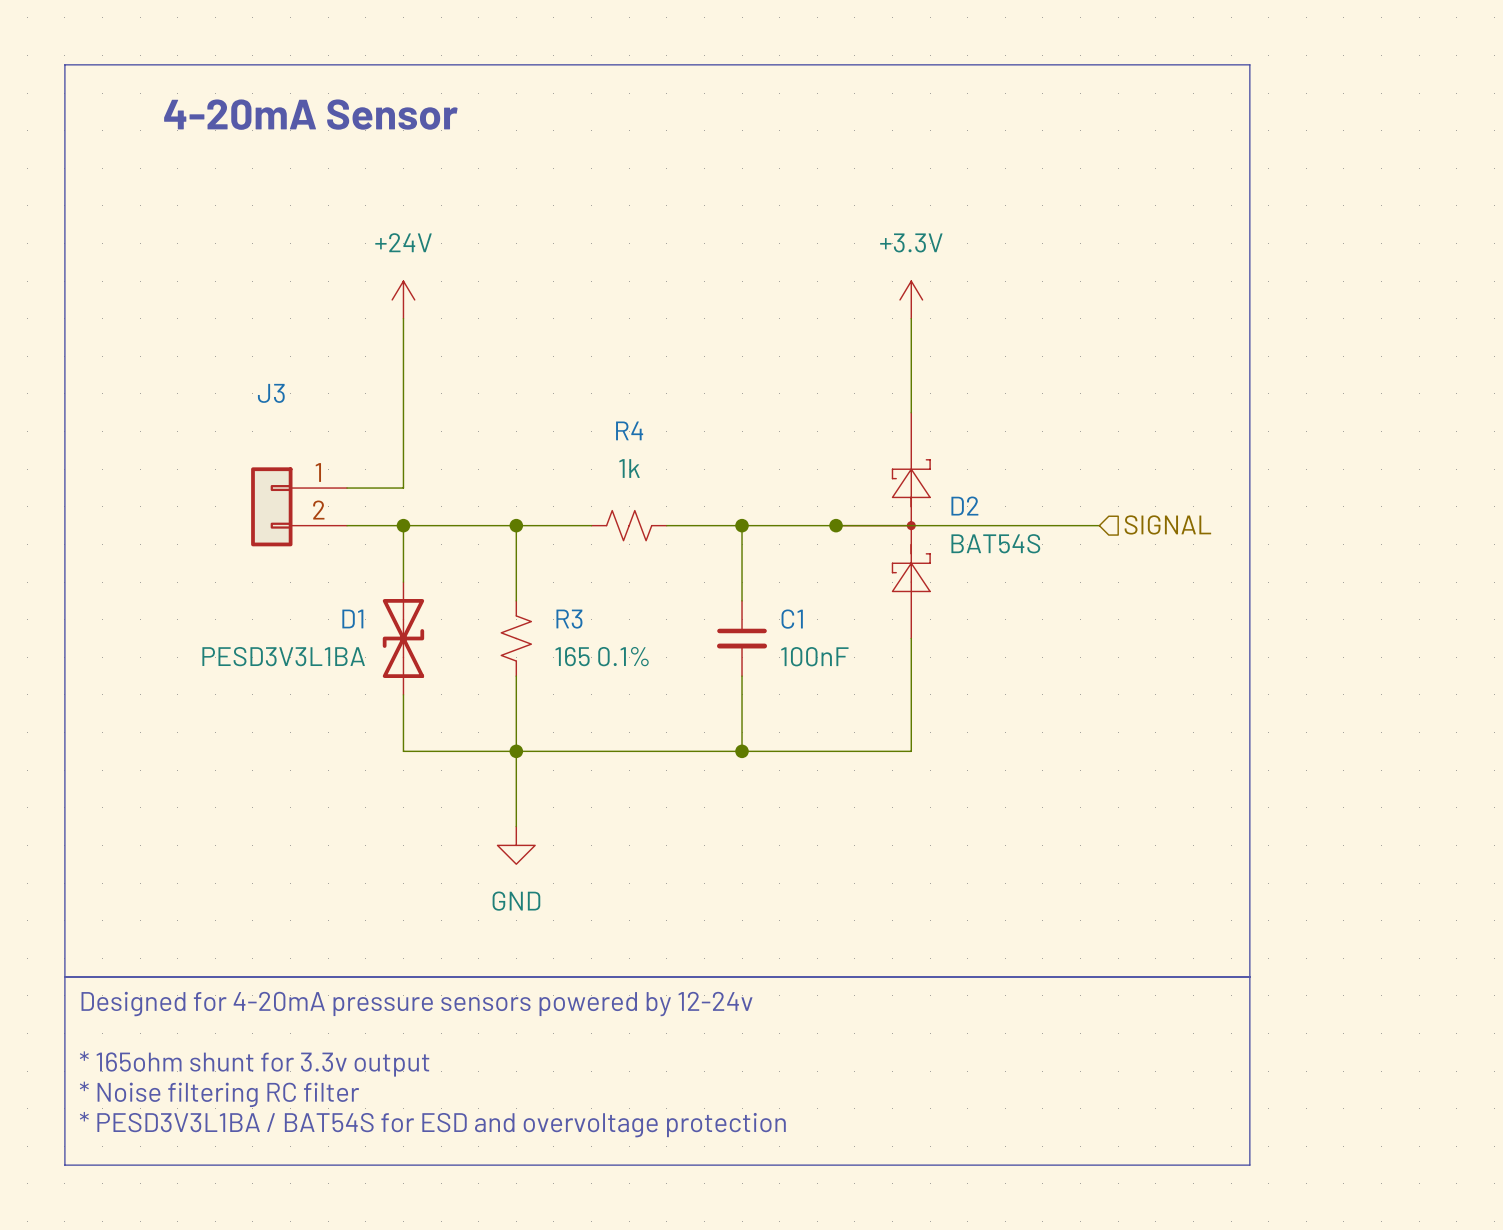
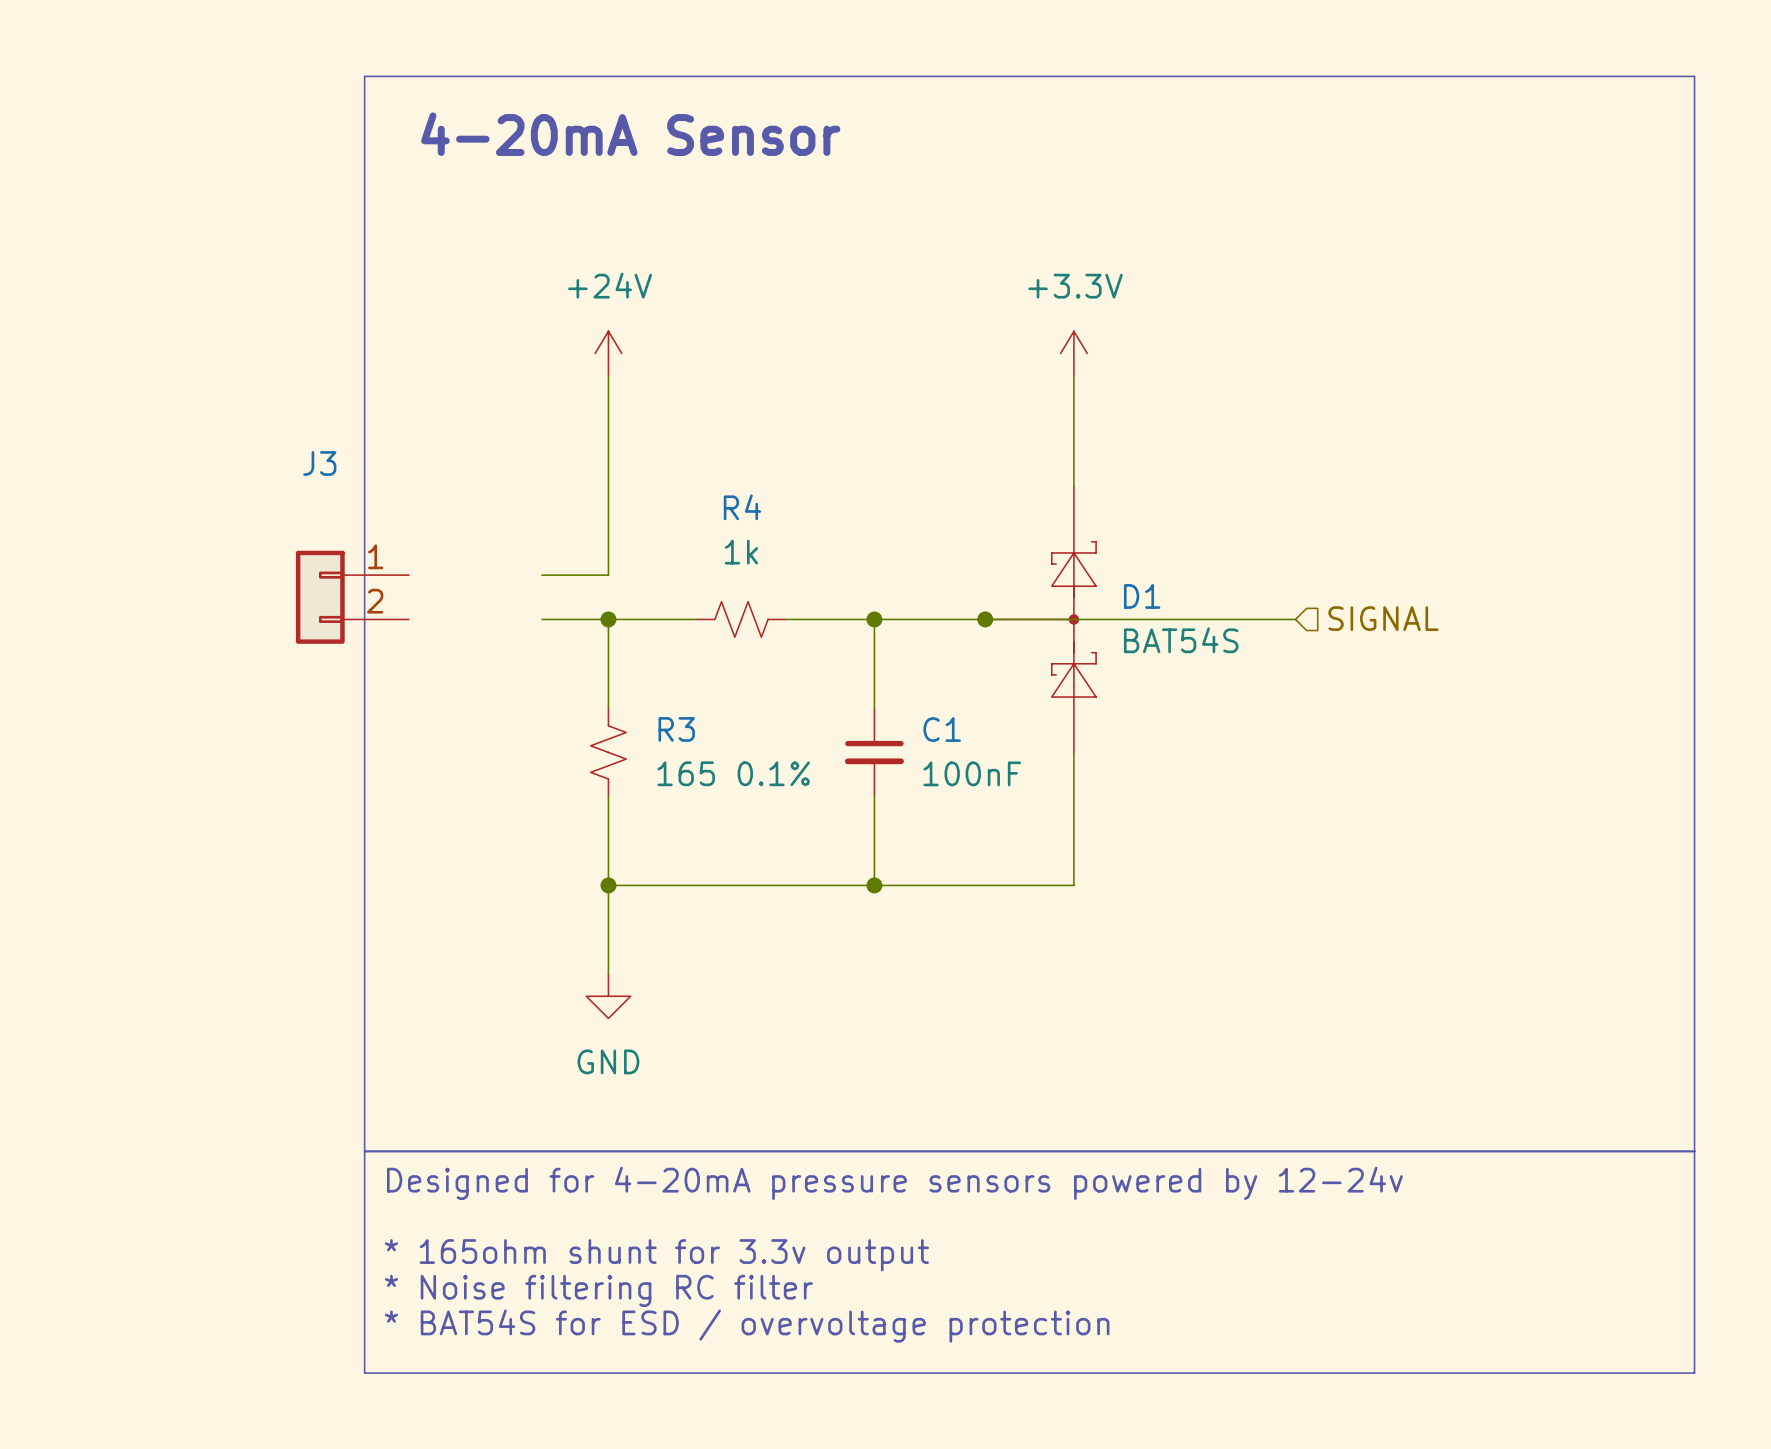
line: (309, 64) (64, 64) (64, 1165) (309, 1165) -> (364, 76) (364, 1373)
line: (1249, 64) (1249, 1165) -> (1472, 76) (1694, 76) (1694, 1373) (1472, 1373)
text position: 4-20mA Sensor (310, 114) -> 4-20mA Sensor (630, 134)
power symbol position: +24V (403, 299) -> +24V (608, 353)
wire: (403, 318) (403, 488) (347, 488) -> (608, 375) (608, 575) (541, 575)
D2 name: D2 (964, 506) -> D1 (1142, 596)
wire: (347, 525) (459, 525) -> none
wire: (403, 525) (403, 582) -> none
junction: (403, 525) -> none
D1: PESD3V3L1BA (403, 638) -> none
wire: (403, 694) (403, 751) (516, 751) -> none
line: (64, 977) (309, 977) -> none
line: none -> (1472, 1151) (1694, 1151)
text position: Designed for 4-20mA pressure sensors powered by 12-24v (417, 1004) -> Designed for 4-20mA pressure sensors powered by 12-24v (894, 1183)
text position: * 165ohm shunt for 3.3v output (254, 1063) -> * 165ohm shunt for 3.3v output (656, 1255)
text position: * Noise filtering RC filter (219, 1094) -> * Noise filtering RC filter (598, 1290)
text: * PESD3V3L1BA / BAT54S for ESD and overvoltage protection (432, 1124) -> * BAT54S for ESD / overvoltage protection (747, 1326)

